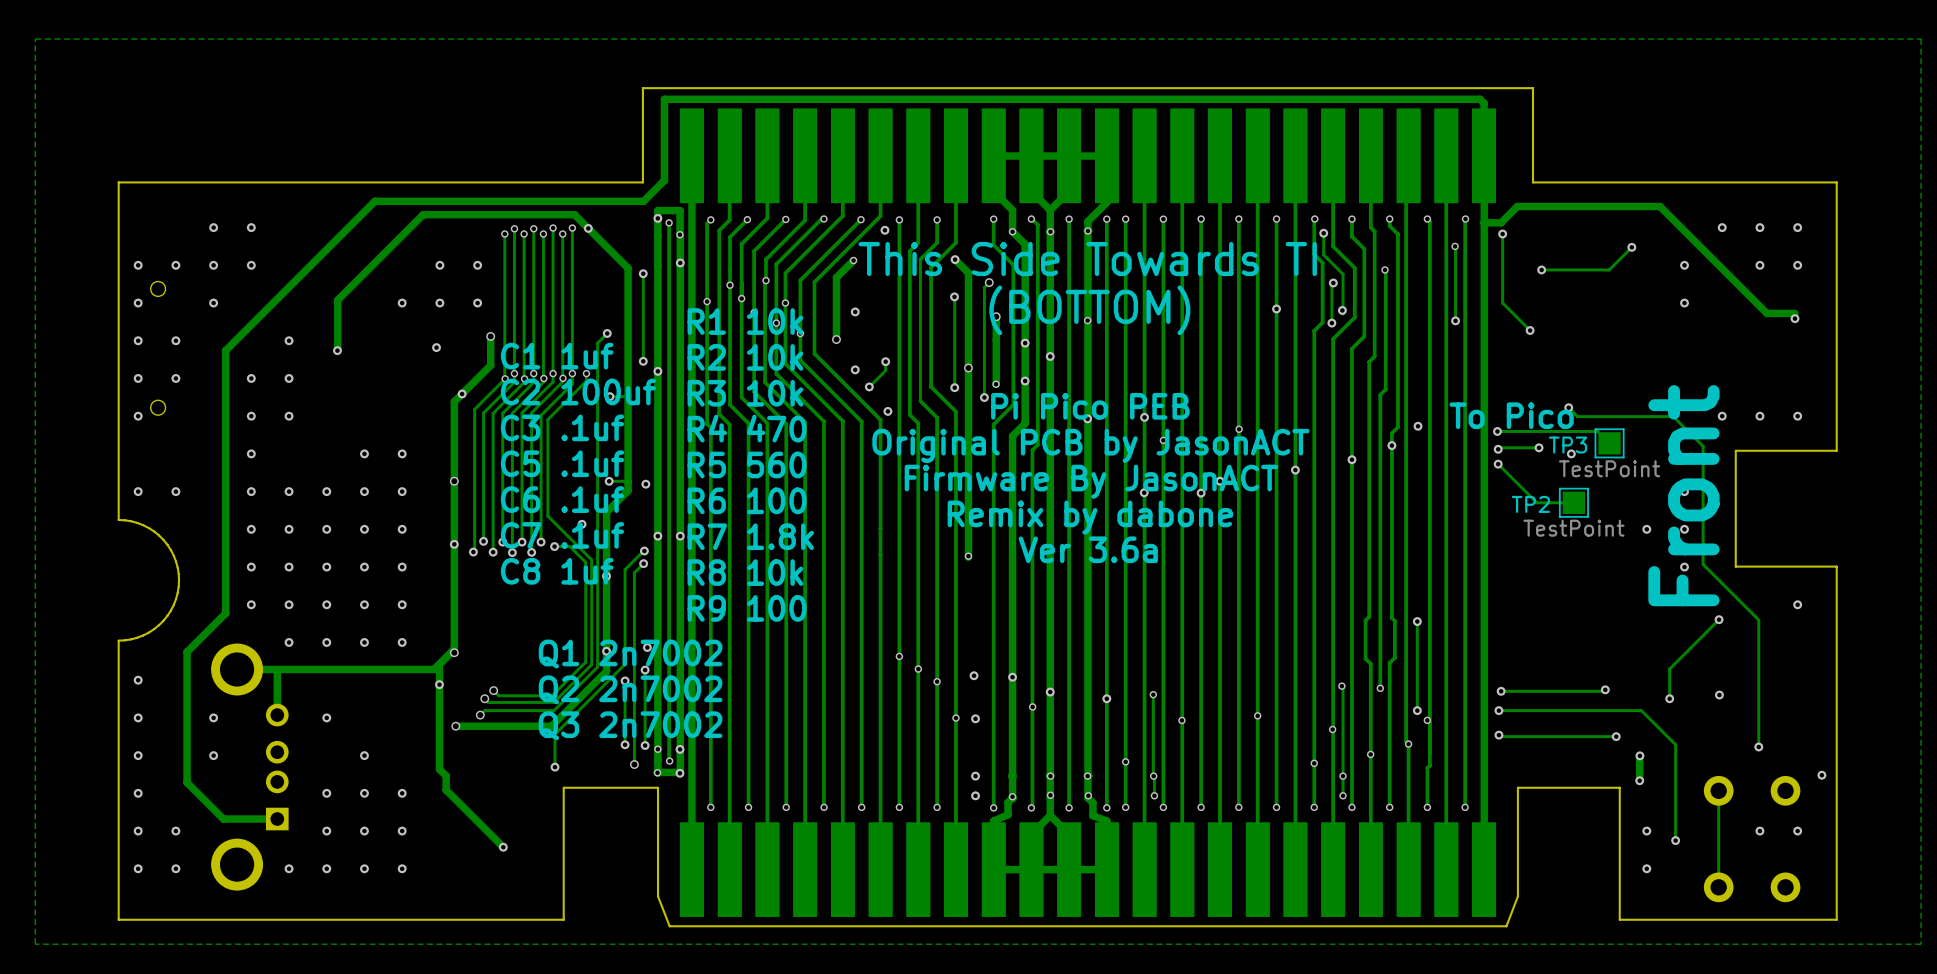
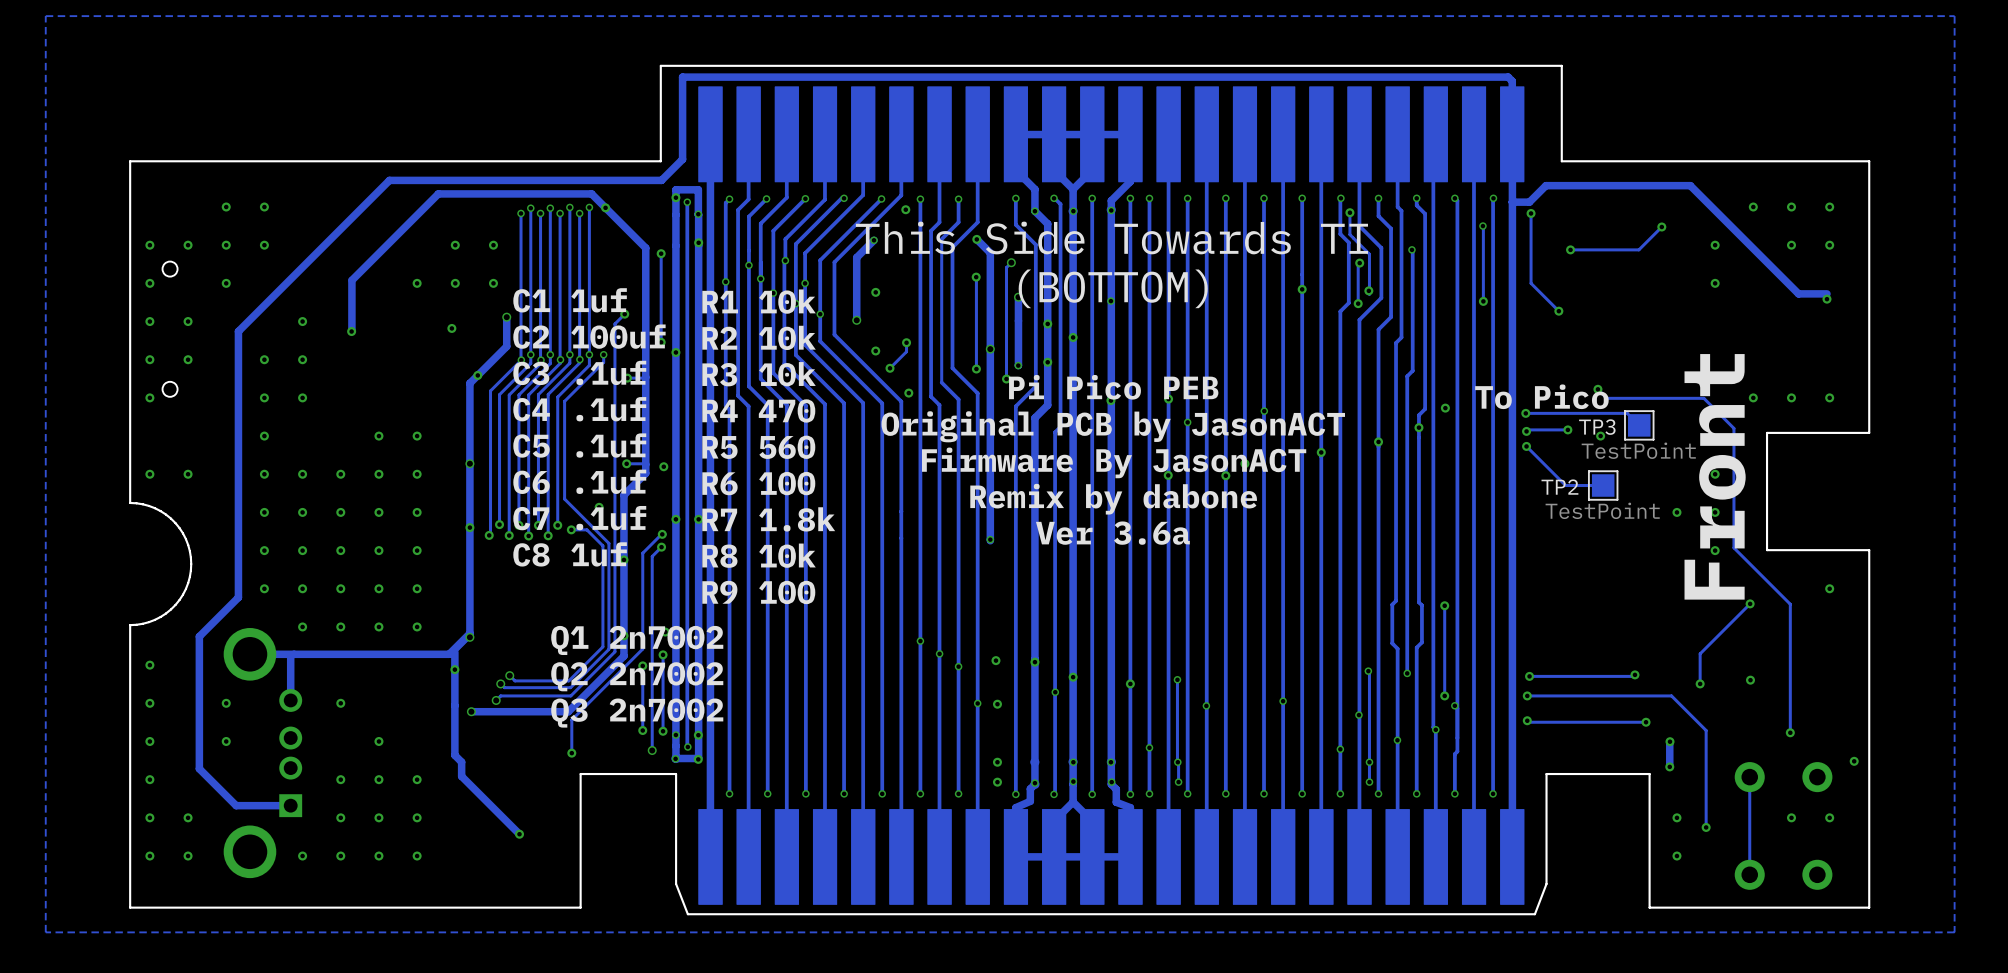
text: none -> C1 1uf (570, 300)
text: C1 1uf (557, 356) -> C2 100uf (589, 336)
text: C2 100uf (578, 392) -> C3 .1uf (579, 372)
text: C3 .1uf (562, 427) -> C4 .1uf (579, 409)

